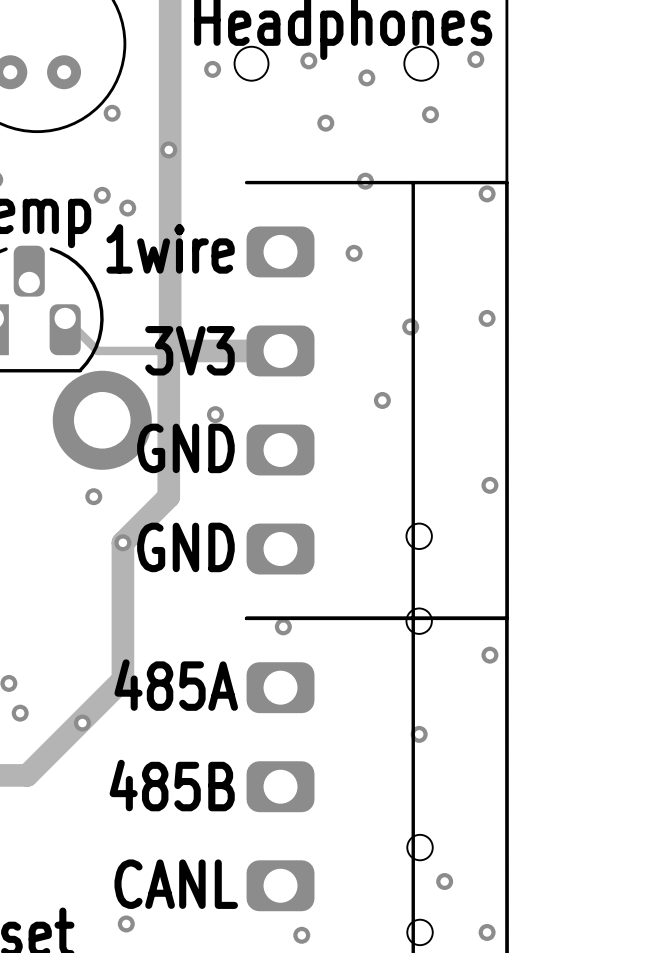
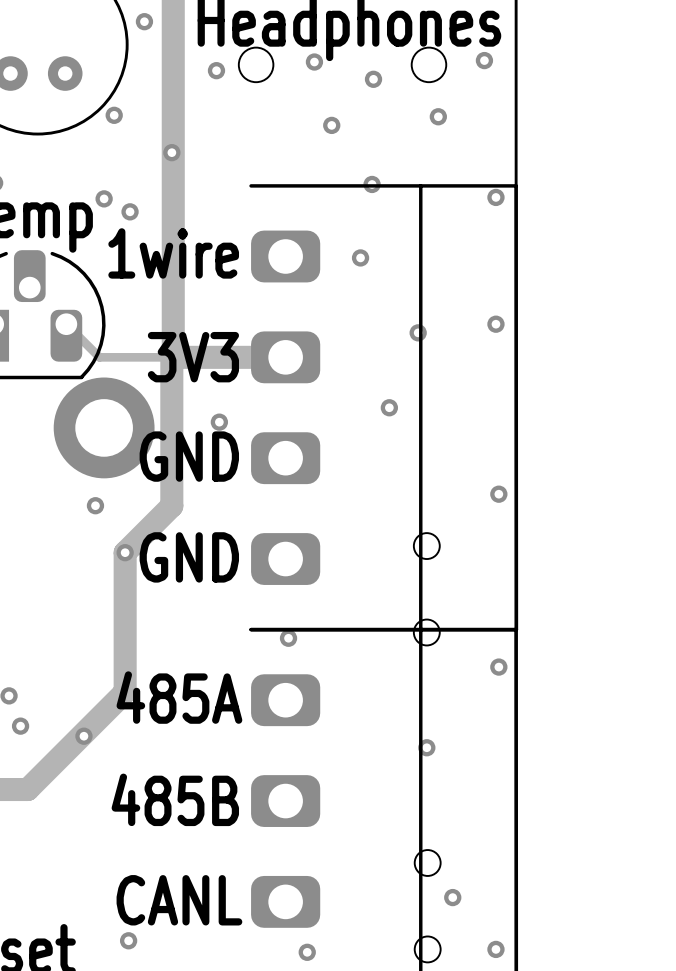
via: none -> (144, 21)

